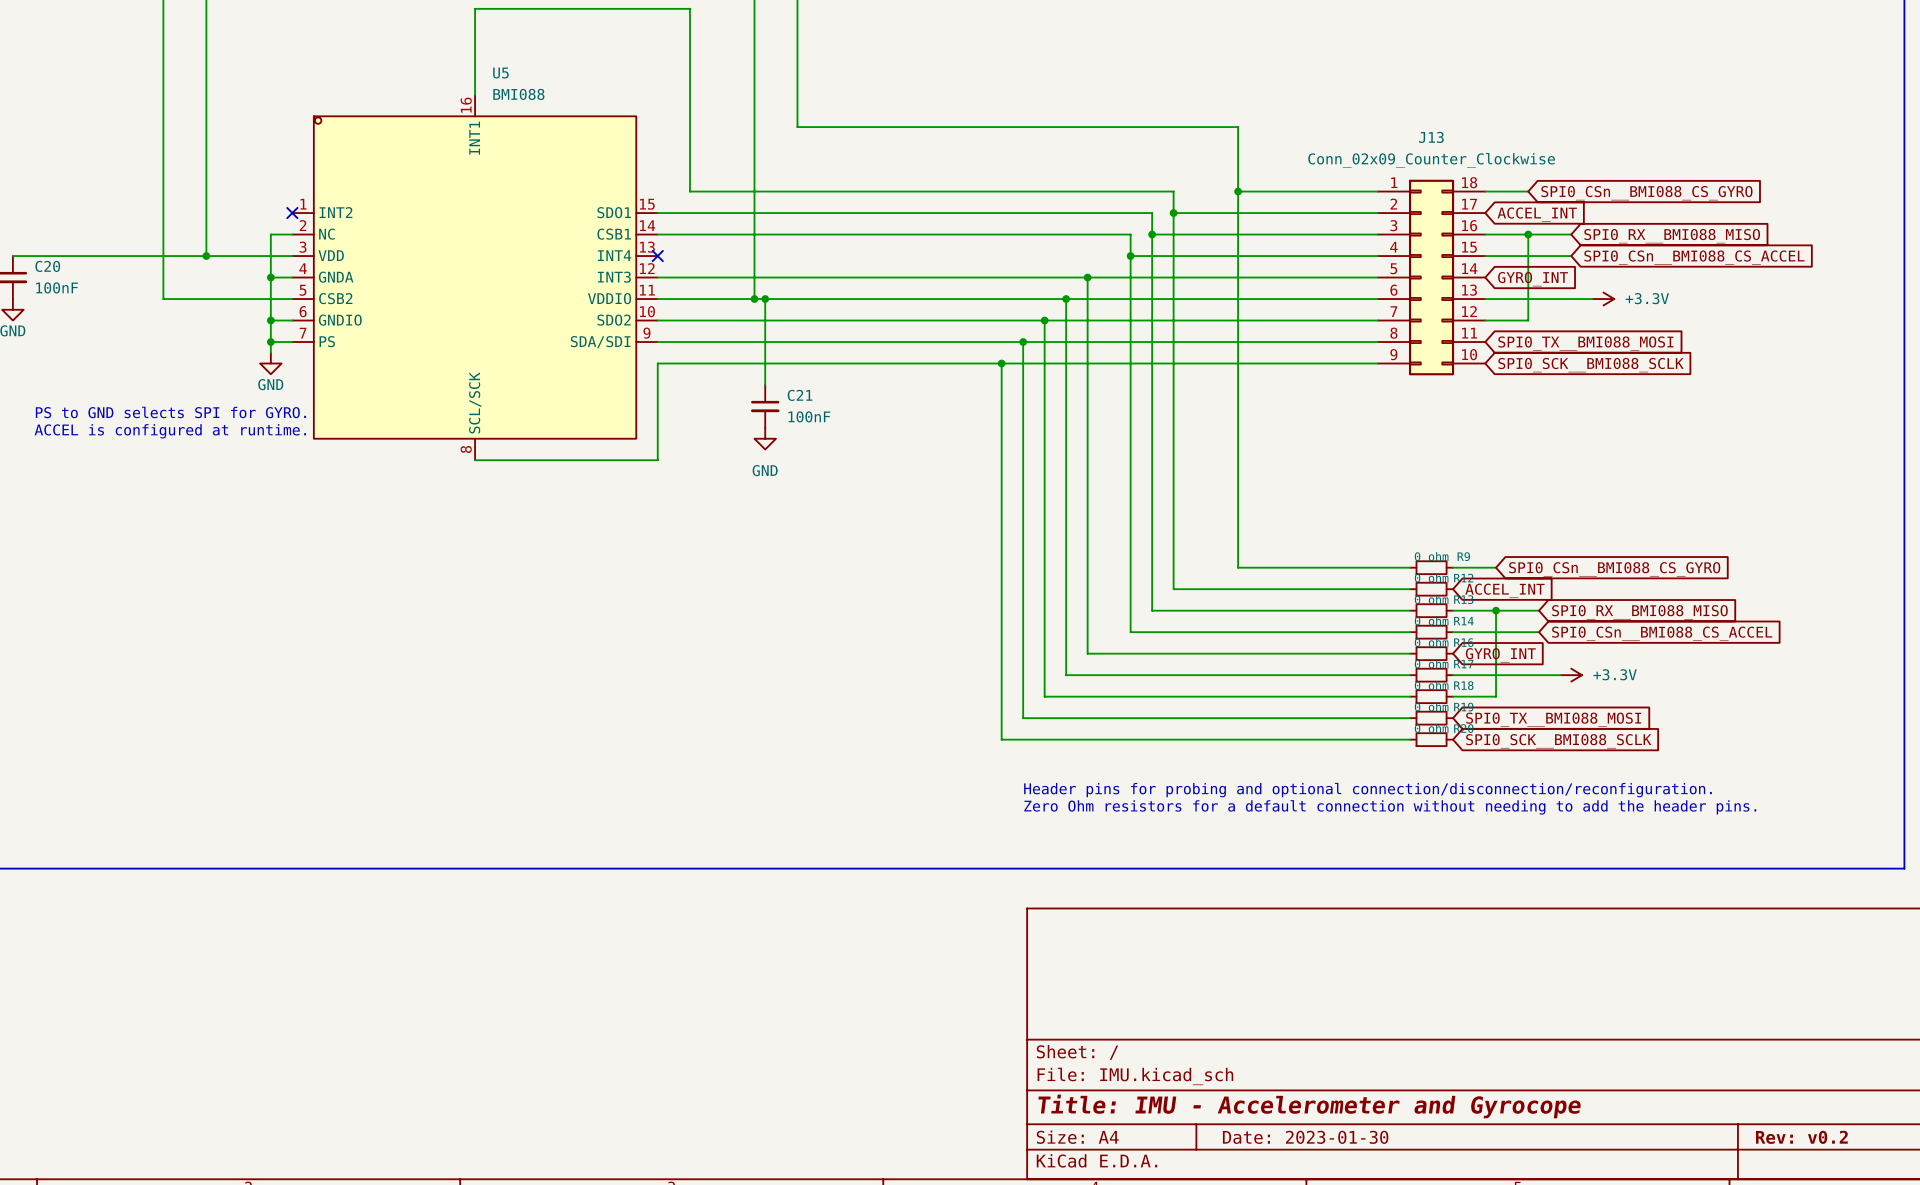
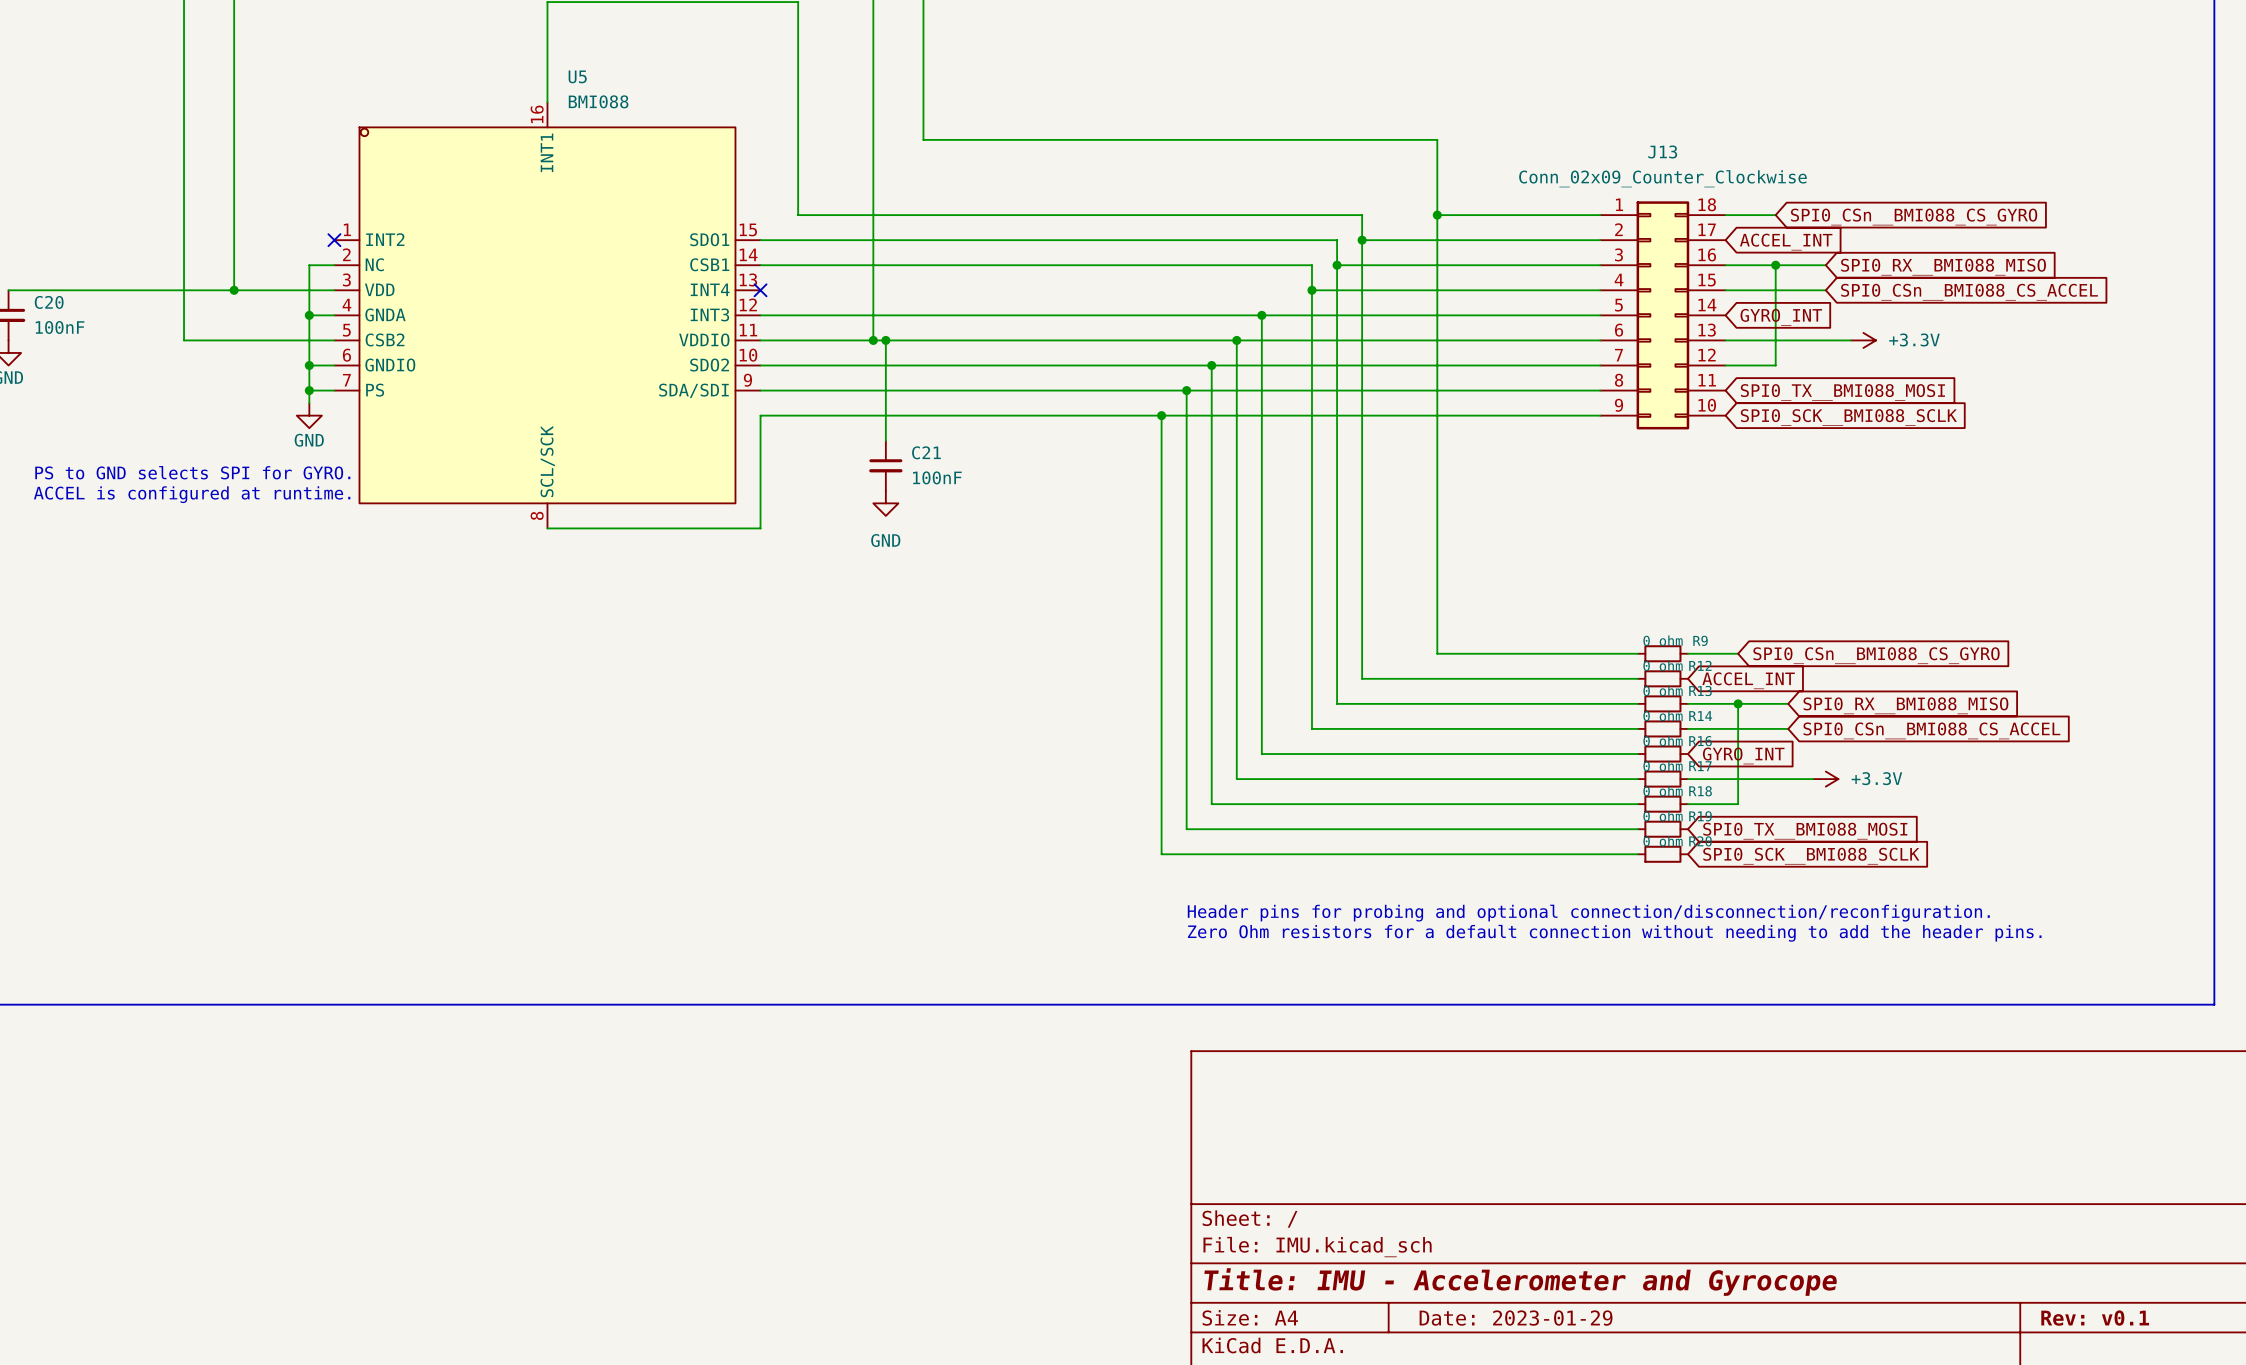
title block: Date: 2023-01-30 (1305, 1137) -> Date: 2023-01-29 (1516, 1318)
title block: Rev: v0.2 (1801, 1137) -> Rev: v0.1 (2095, 1318)

